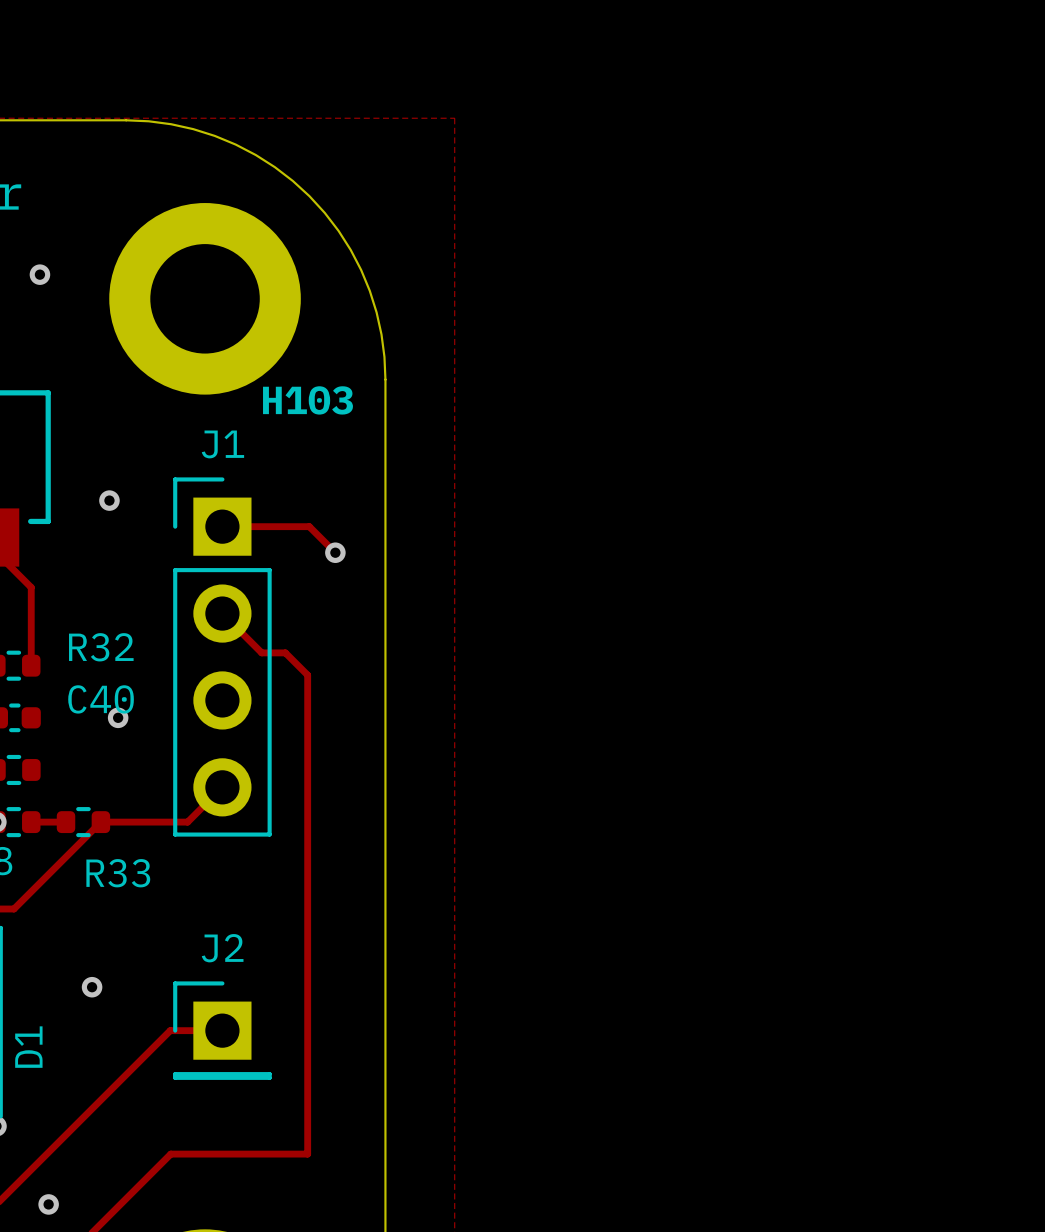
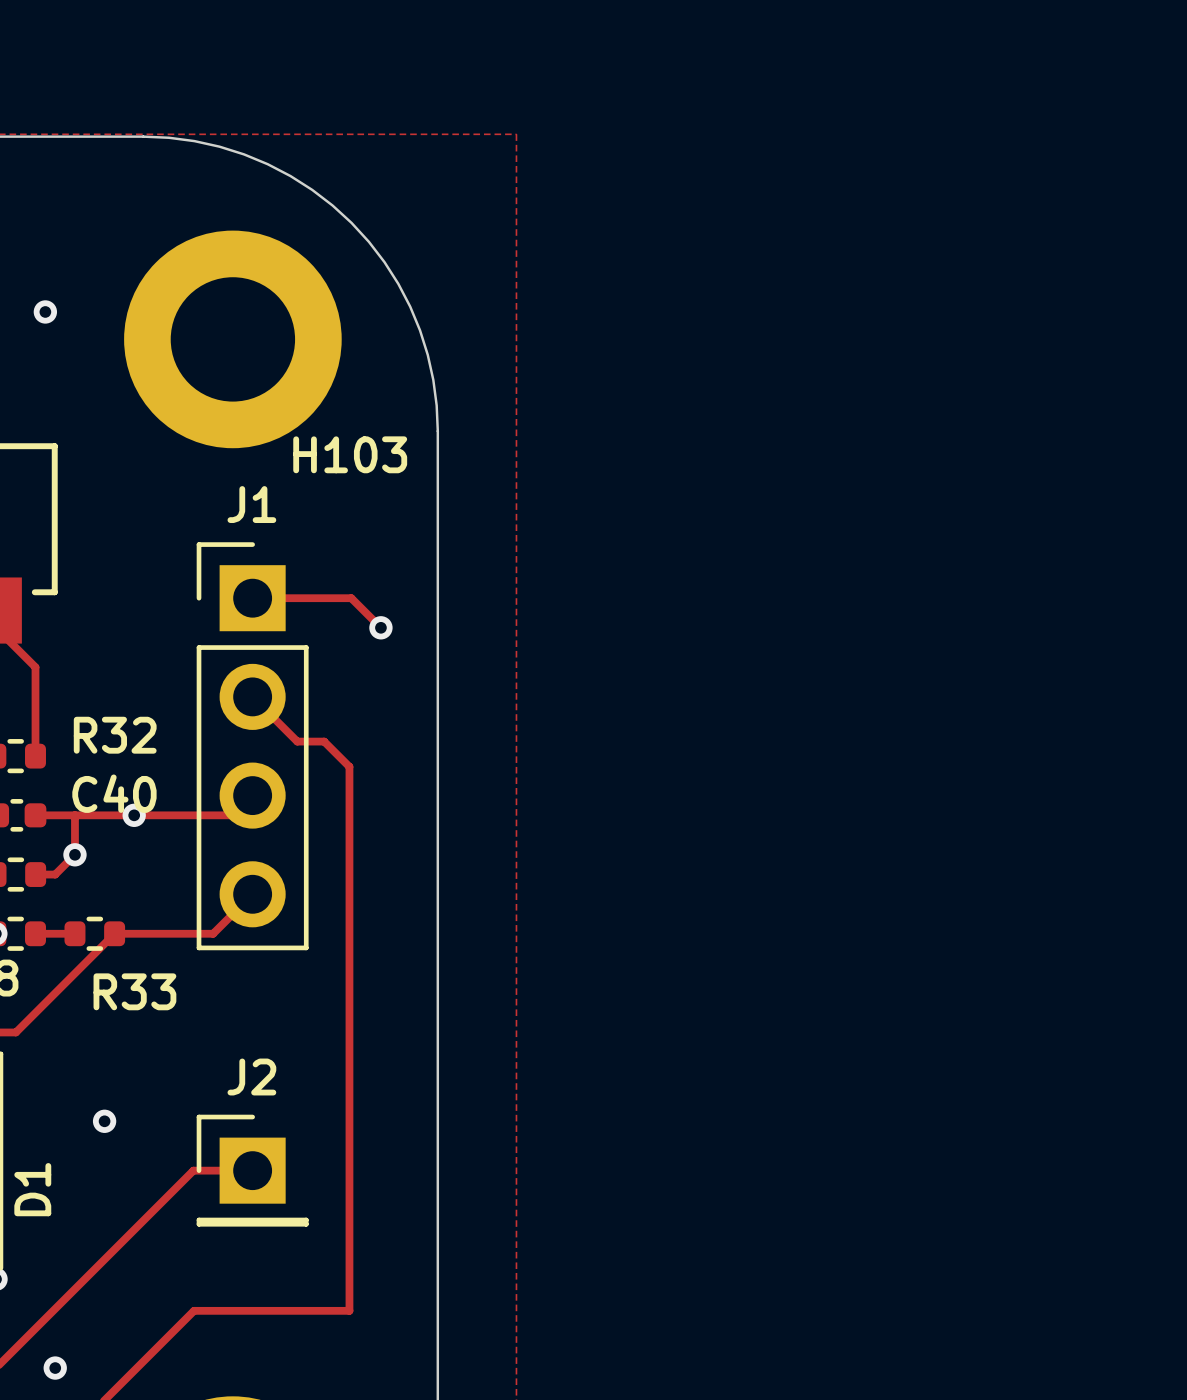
via: (109, 500) -> none
track: none -> (35, 815) (232, 815)
track: none -> (74, 815) (74, 854) (55, 874) (35, 874)
via: none -> (74, 854)

